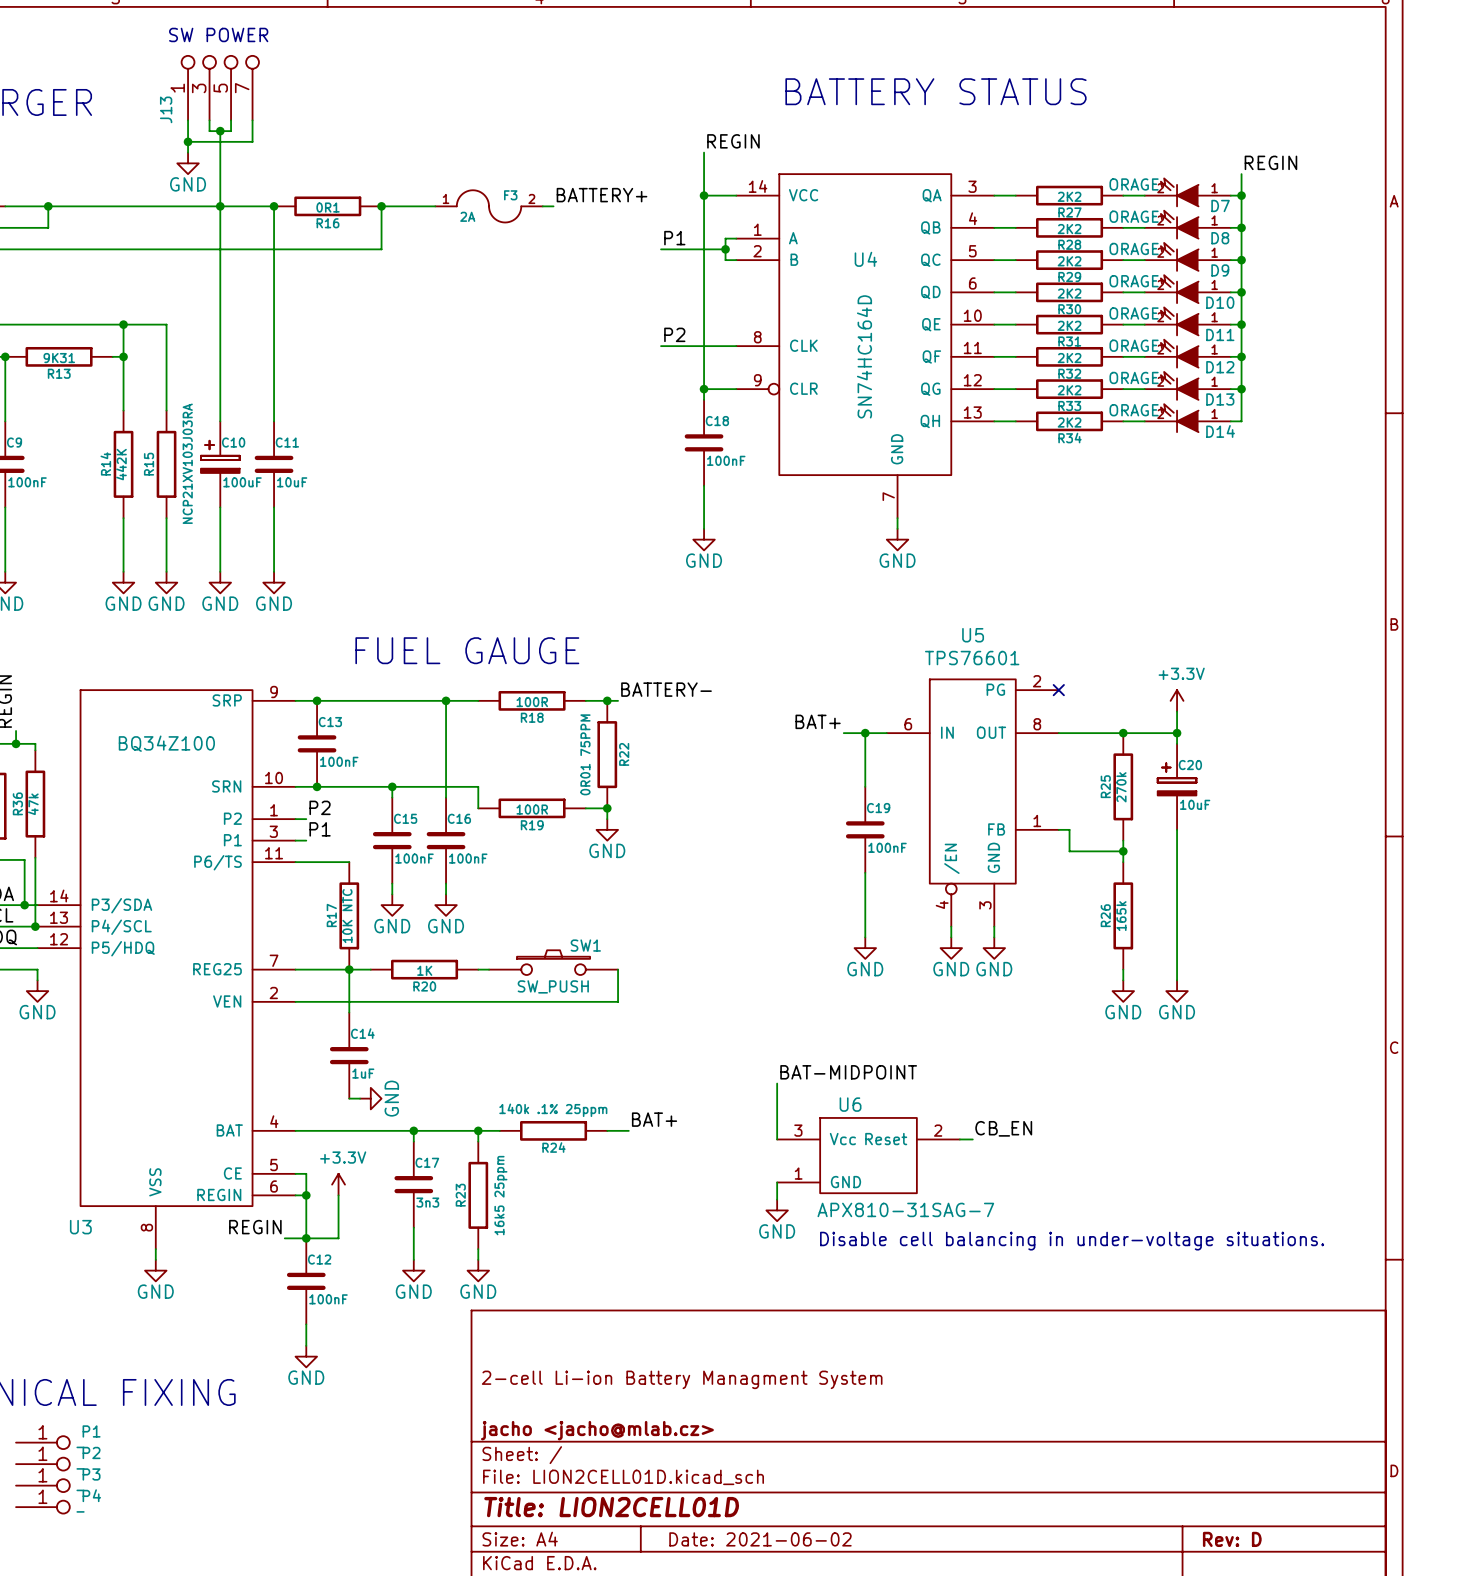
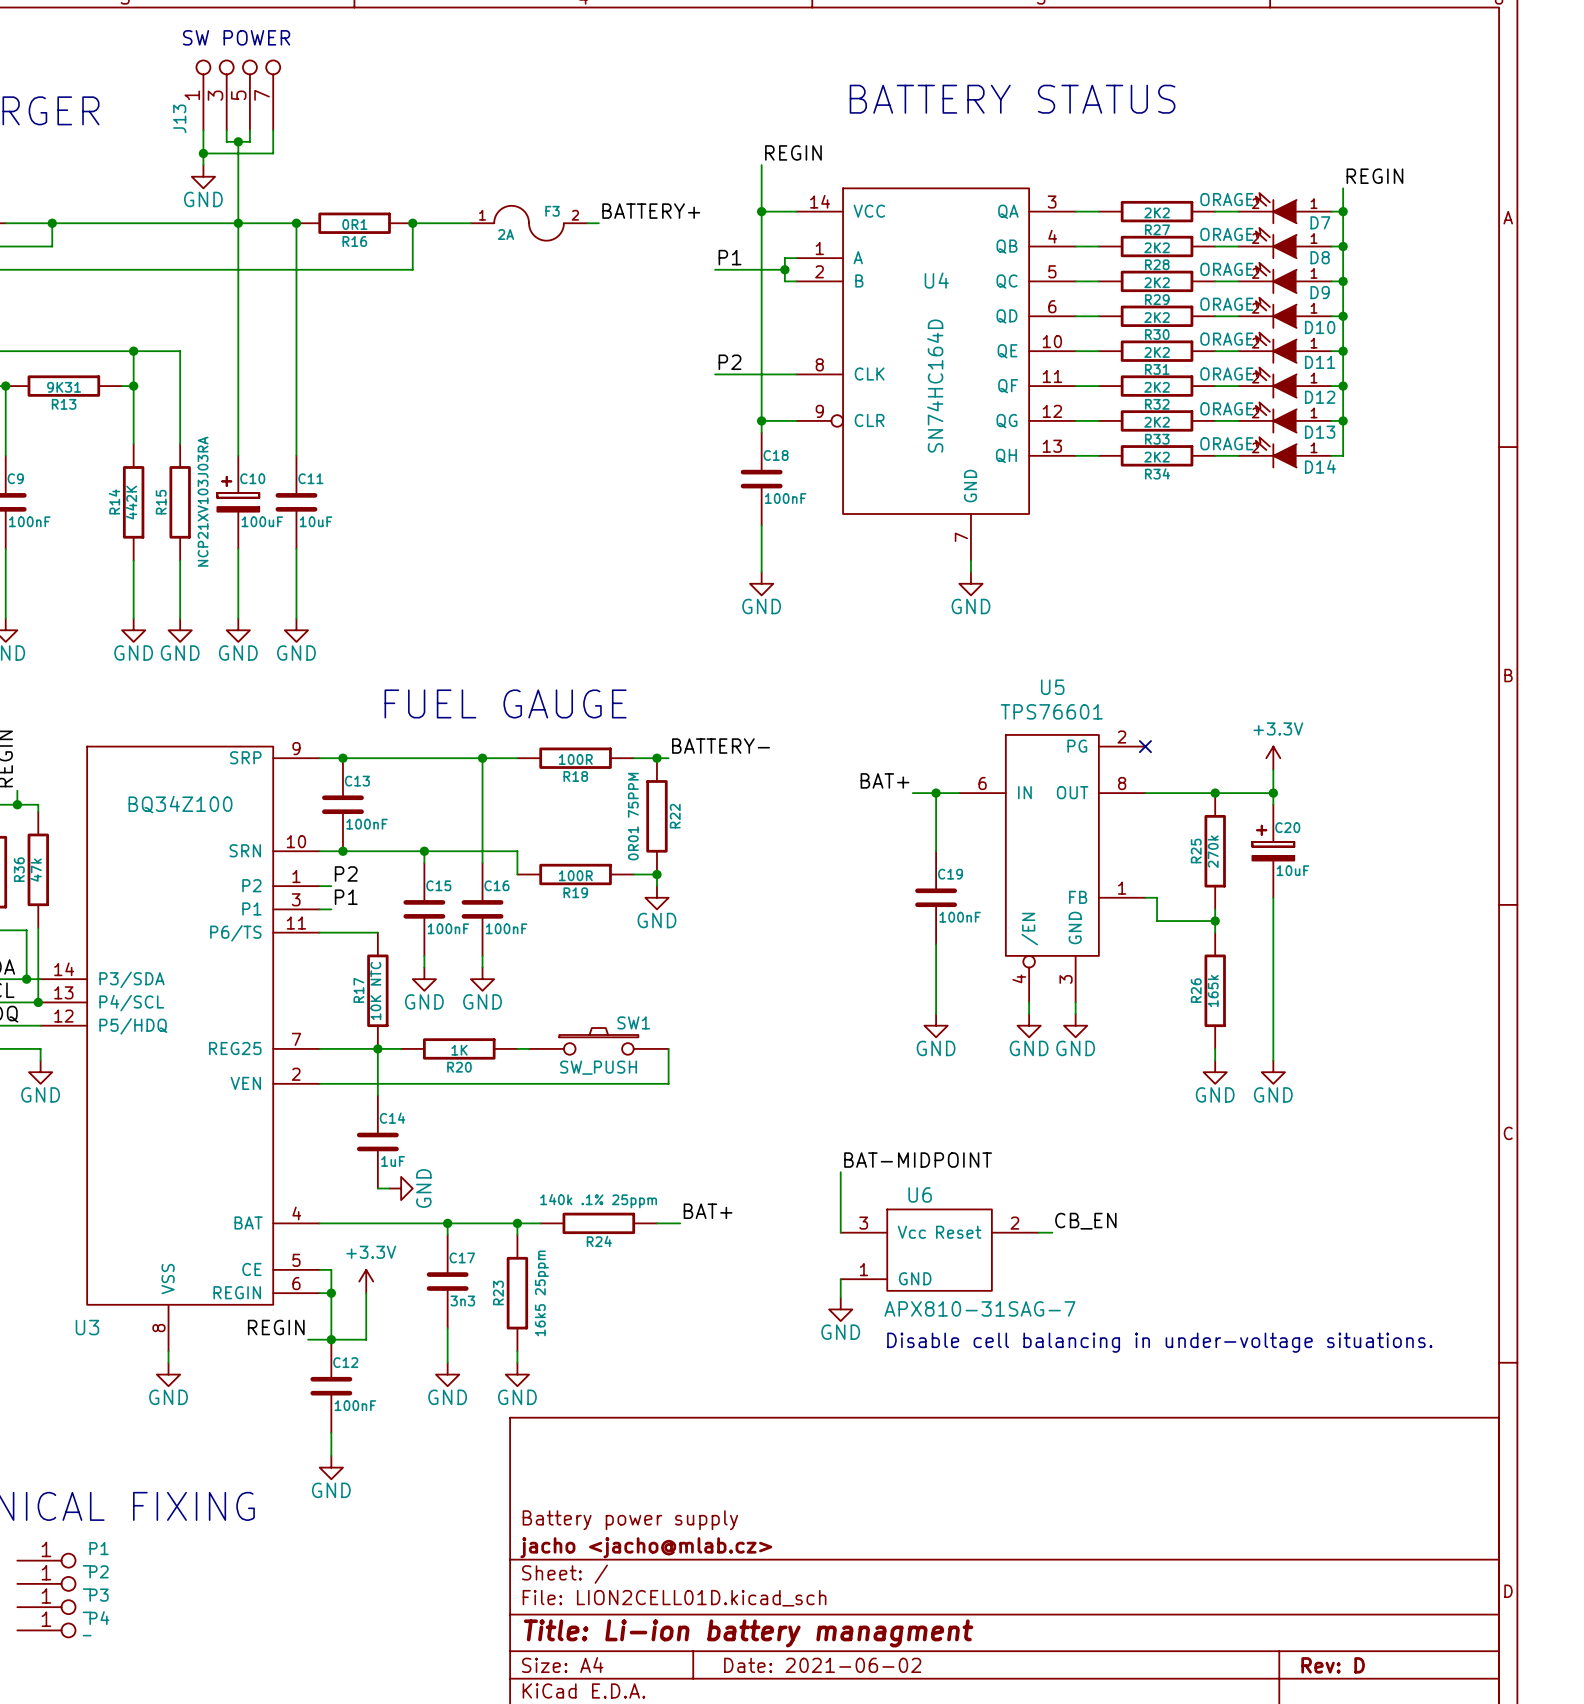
title block: 2-cell Li-ion Battery Managment System (682, 1379) -> none
title block: none -> Battery power supply (630, 1520)
title block: Title: LION2CELL01D (611, 1507) -> Title: Li-ion battery managment (748, 1633)

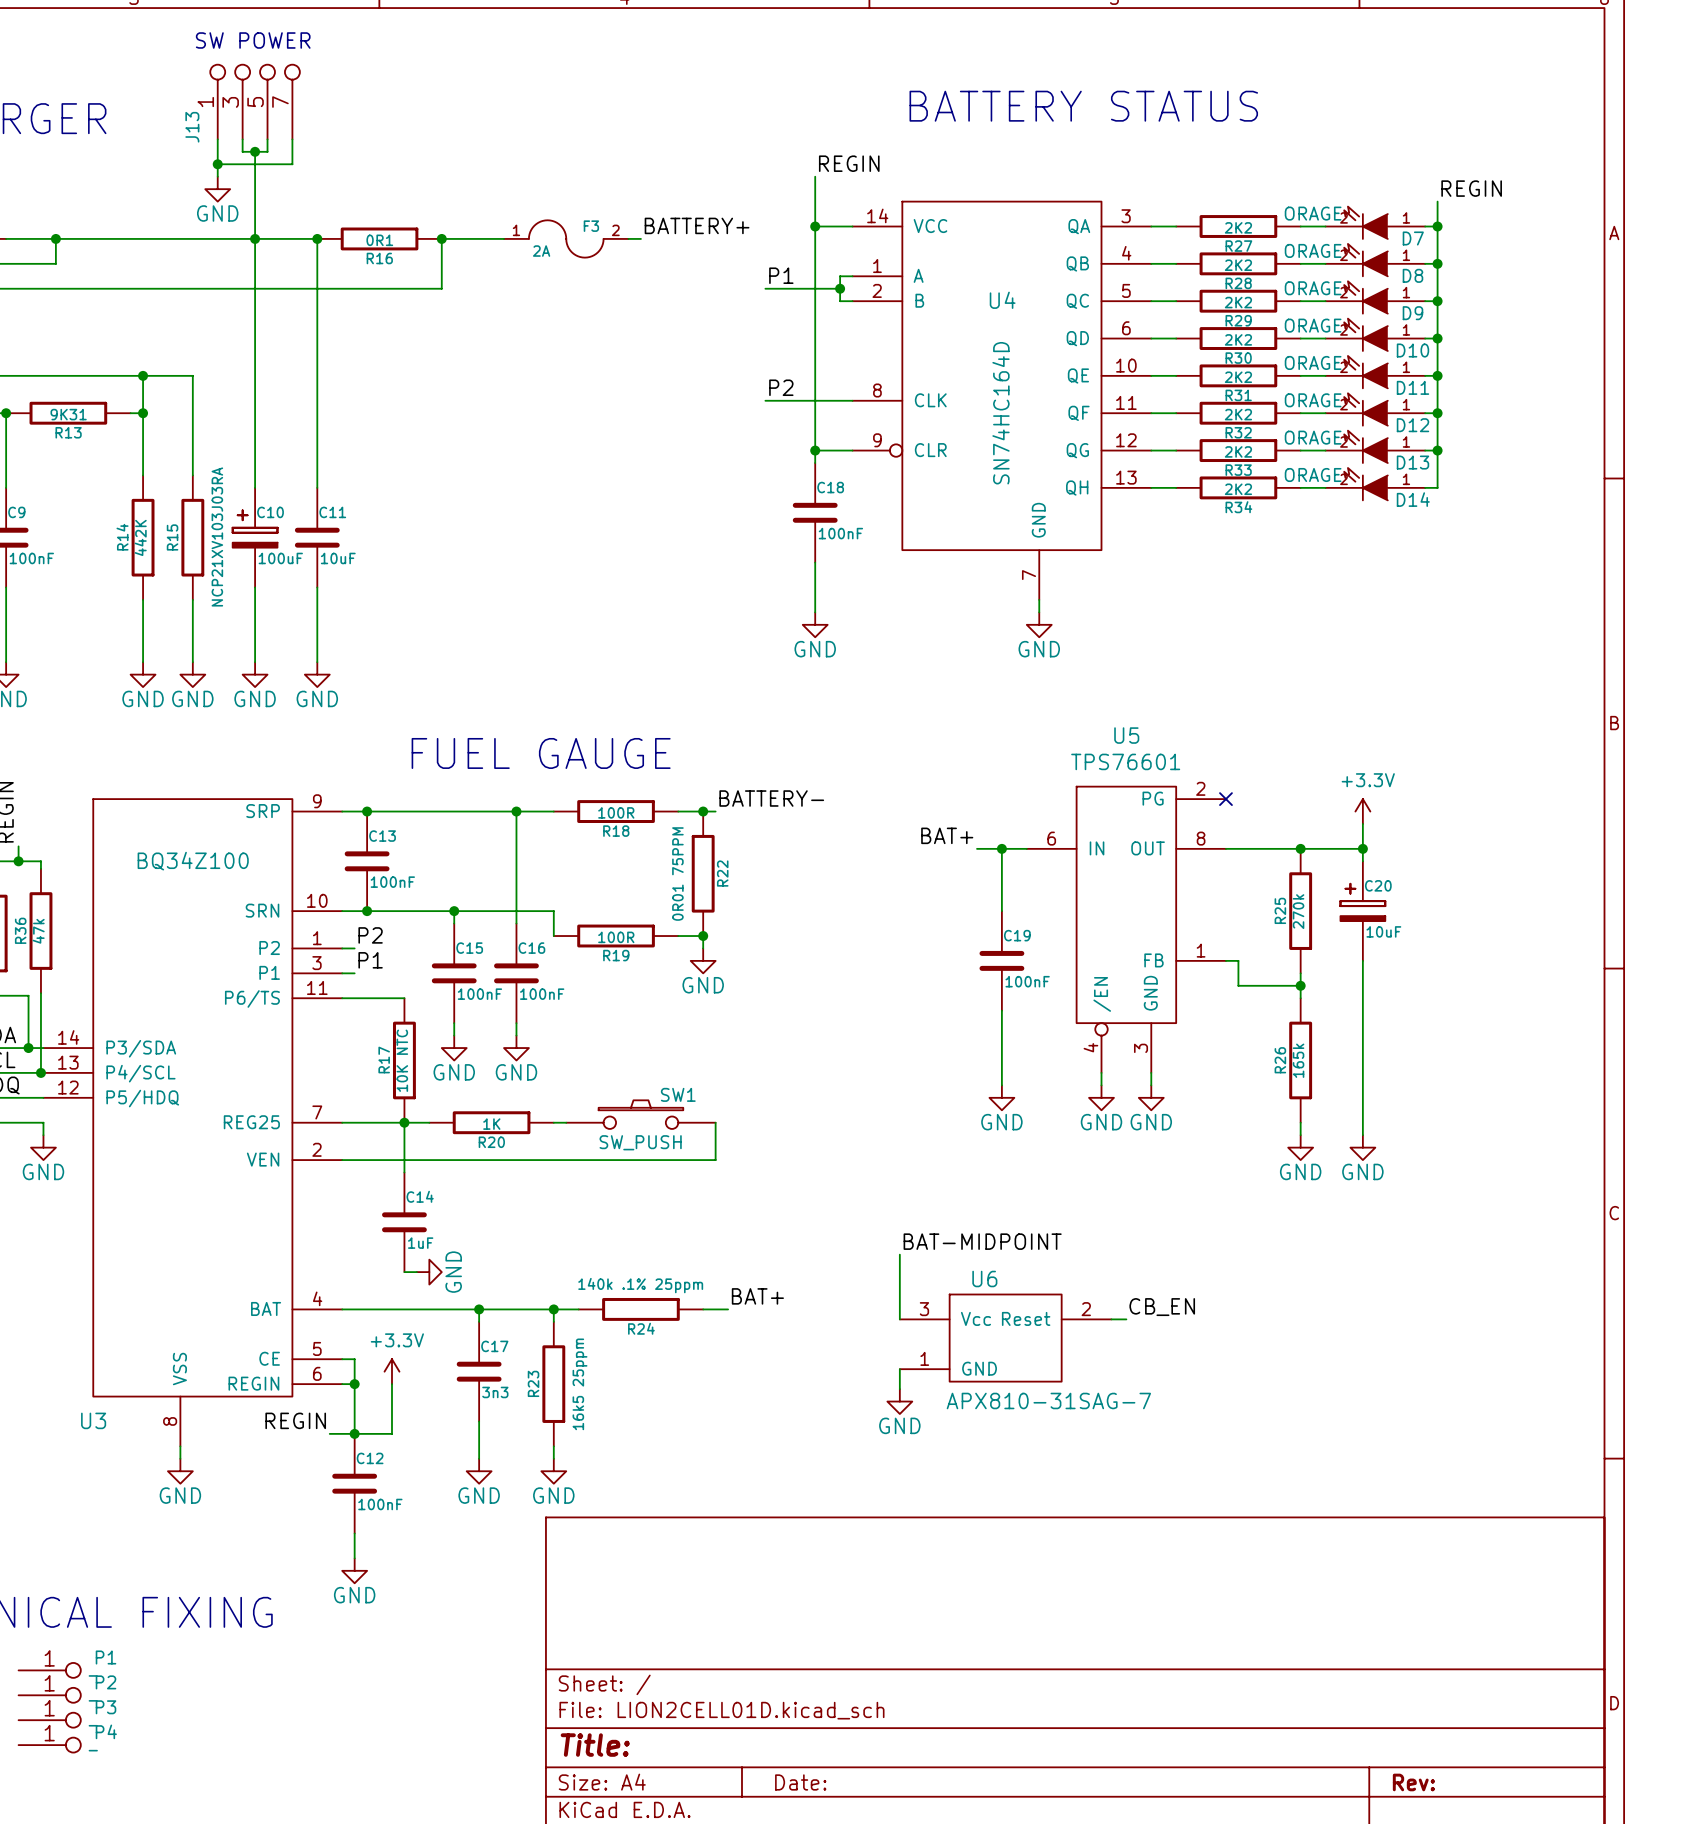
text: Disable cell balancing in under-voltage situations. (1159, 1342) -> none
title block: Battery power supply (630, 1520) -> none
title block: jacho <jacho@mlab.cz> (646, 1547) -> none
title block: Title: Li-ion battery managment (748, 1633) -> Title: (595, 1745)
title block: Date: 2021-06-02 (822, 1665) -> Date: (800, 1782)
title block: Rev: D (1333, 1665) -> Rev: (1413, 1782)

